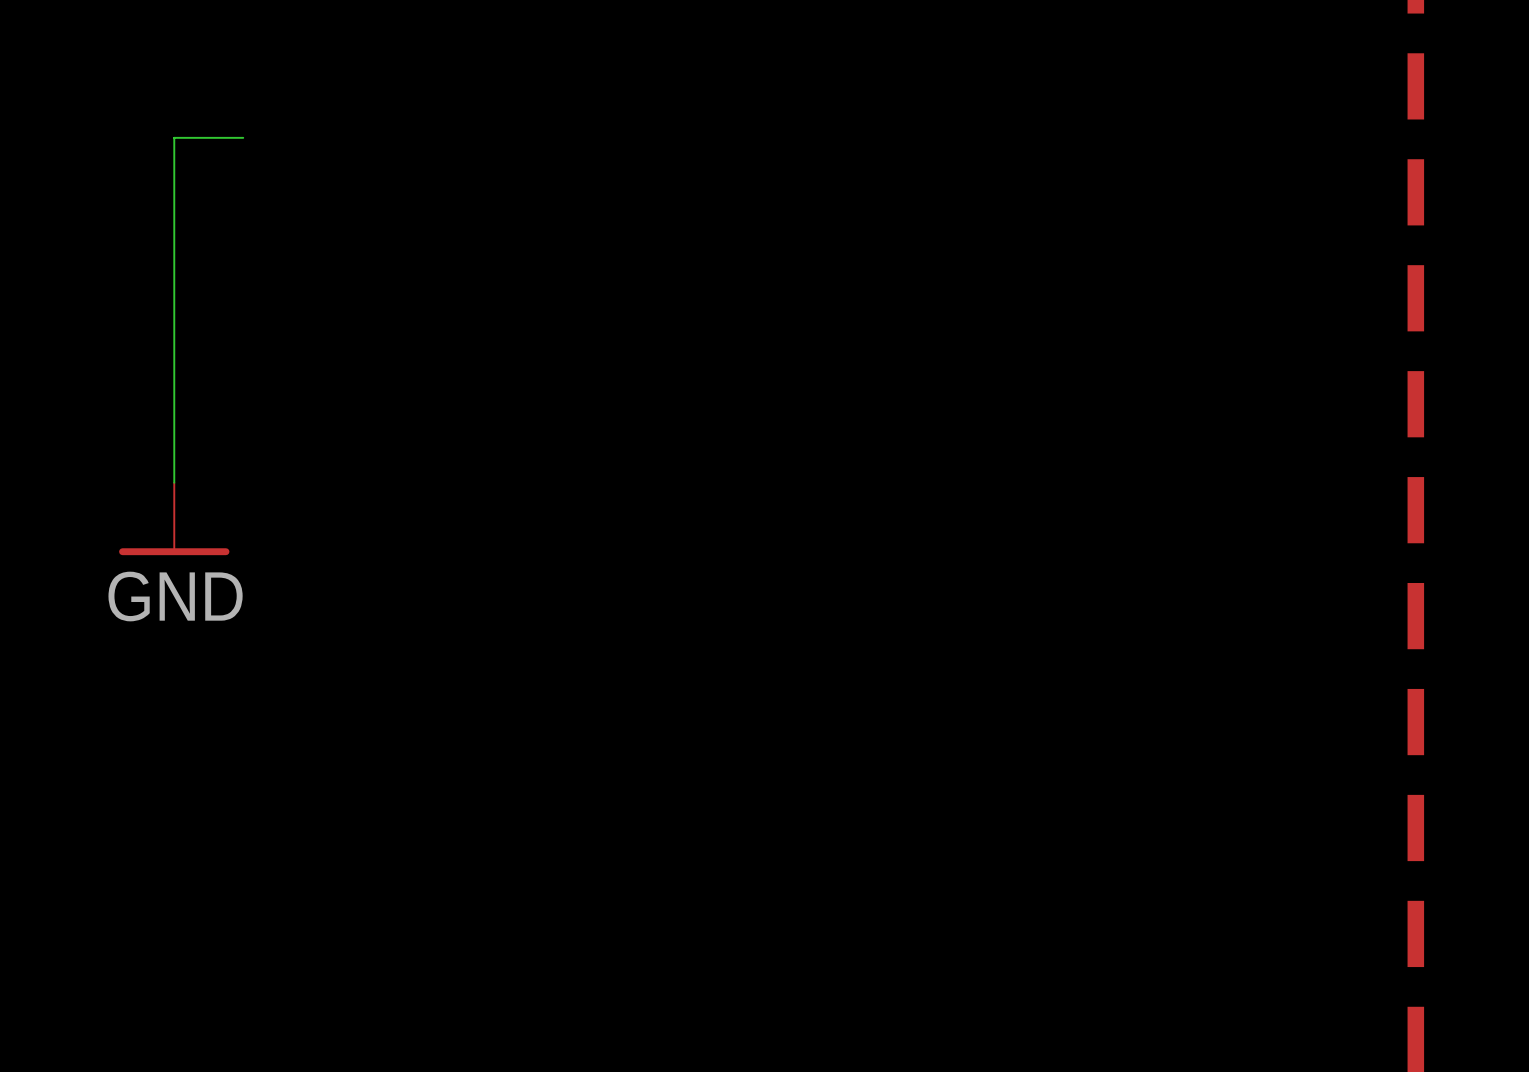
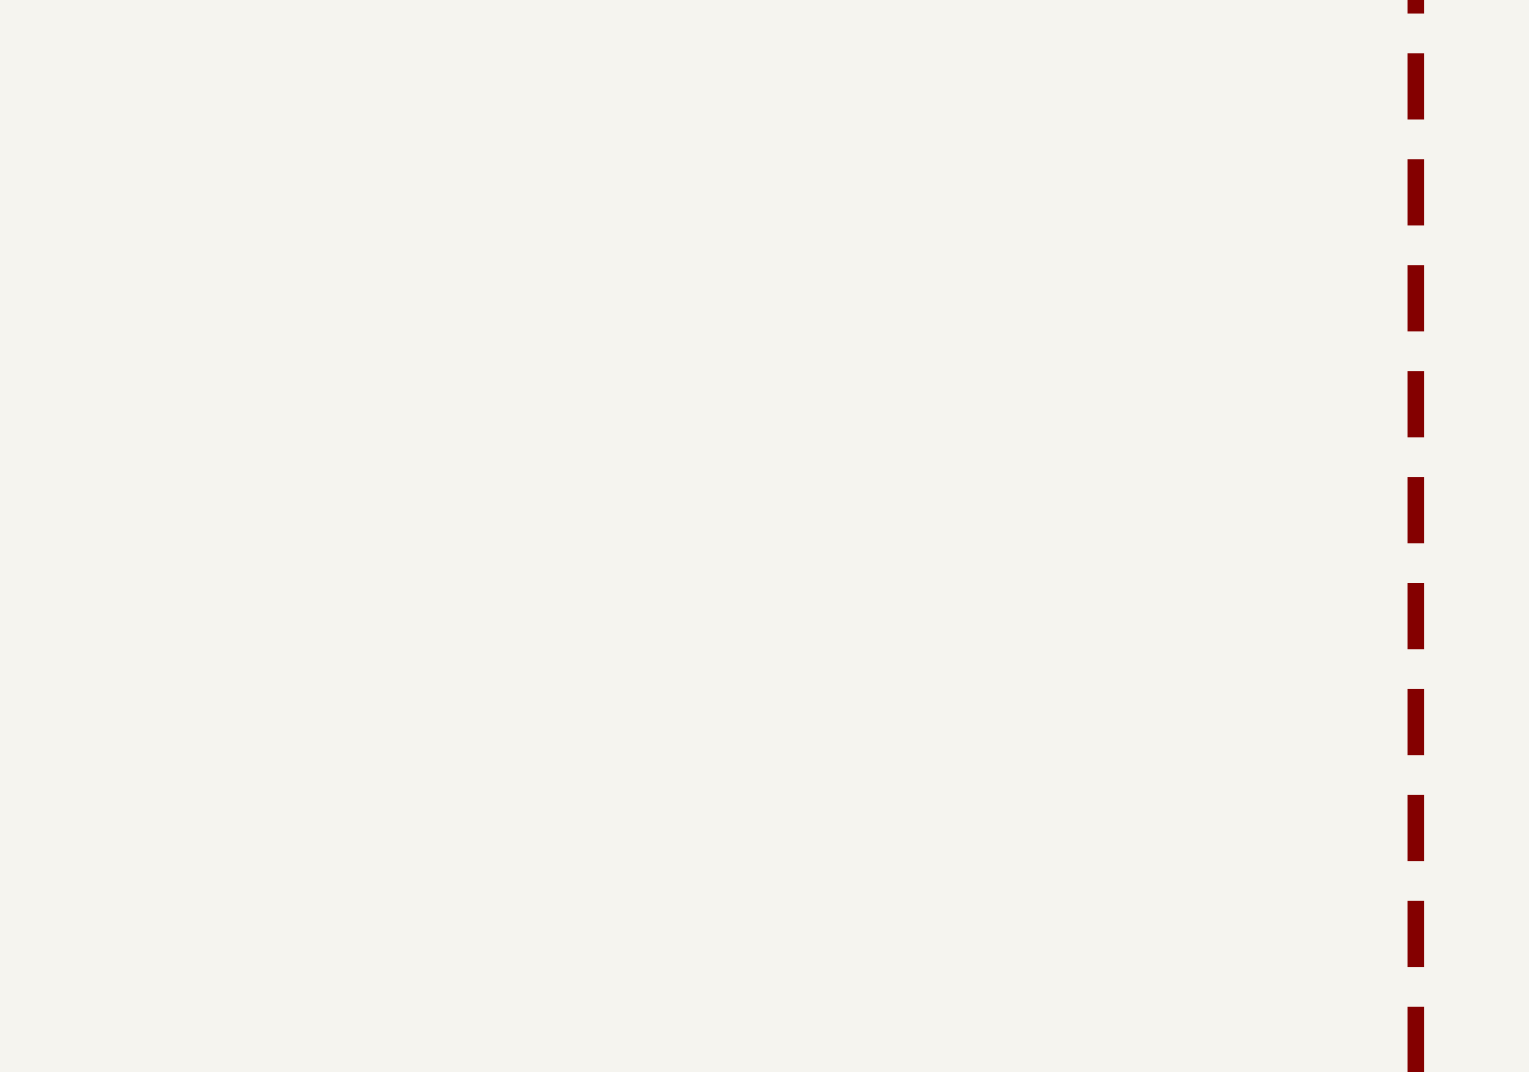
wire: (243, 137) (174, 137) (174, 482) -> none
power symbol: GND (174, 518) -> none

